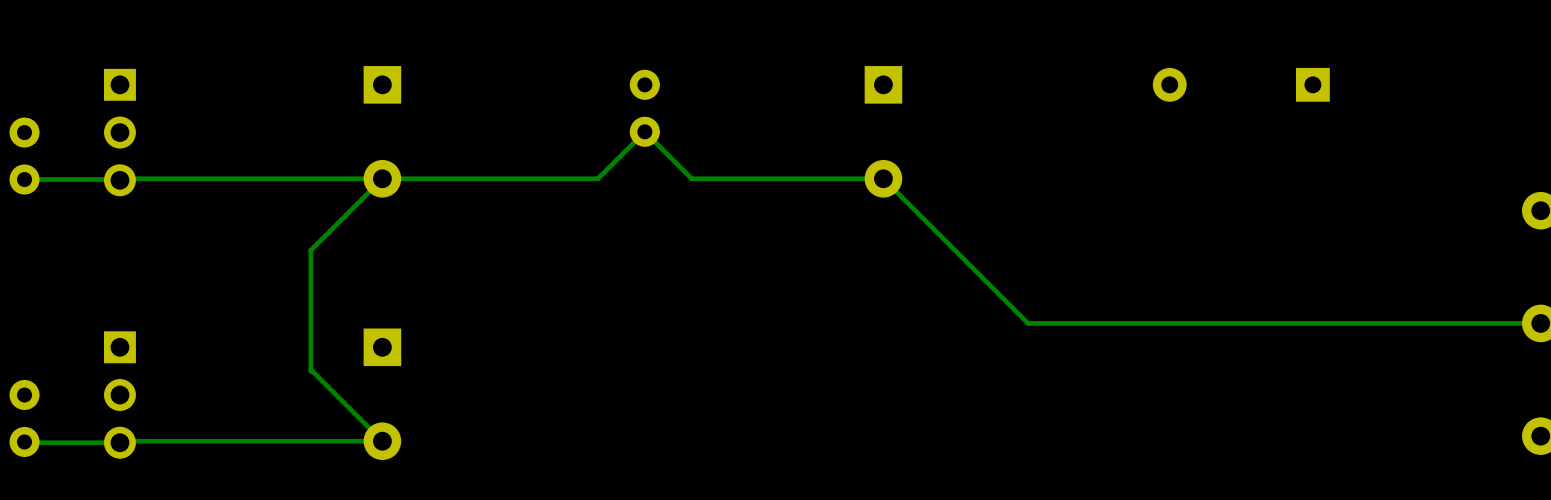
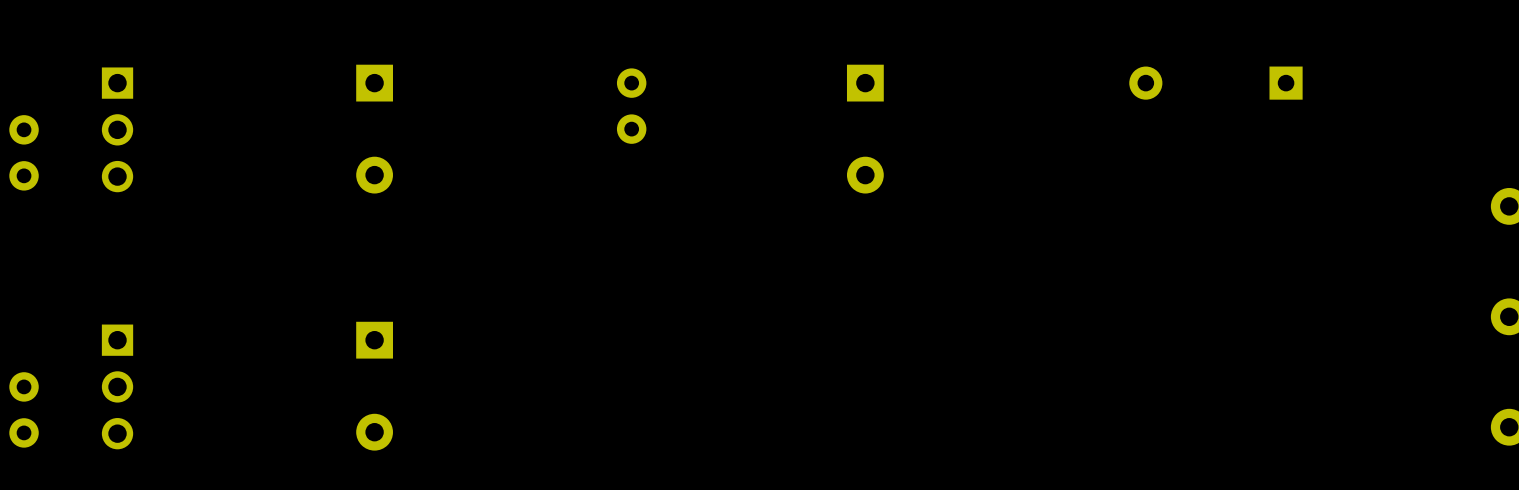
track: (382, 178) (310, 250) (310, 371) (382, 441) (24, 441) -> none
track: (24, 179) (597, 178) (644, 131) (691, 178) (883, 178) (1028, 323) (1540, 323) -> none

